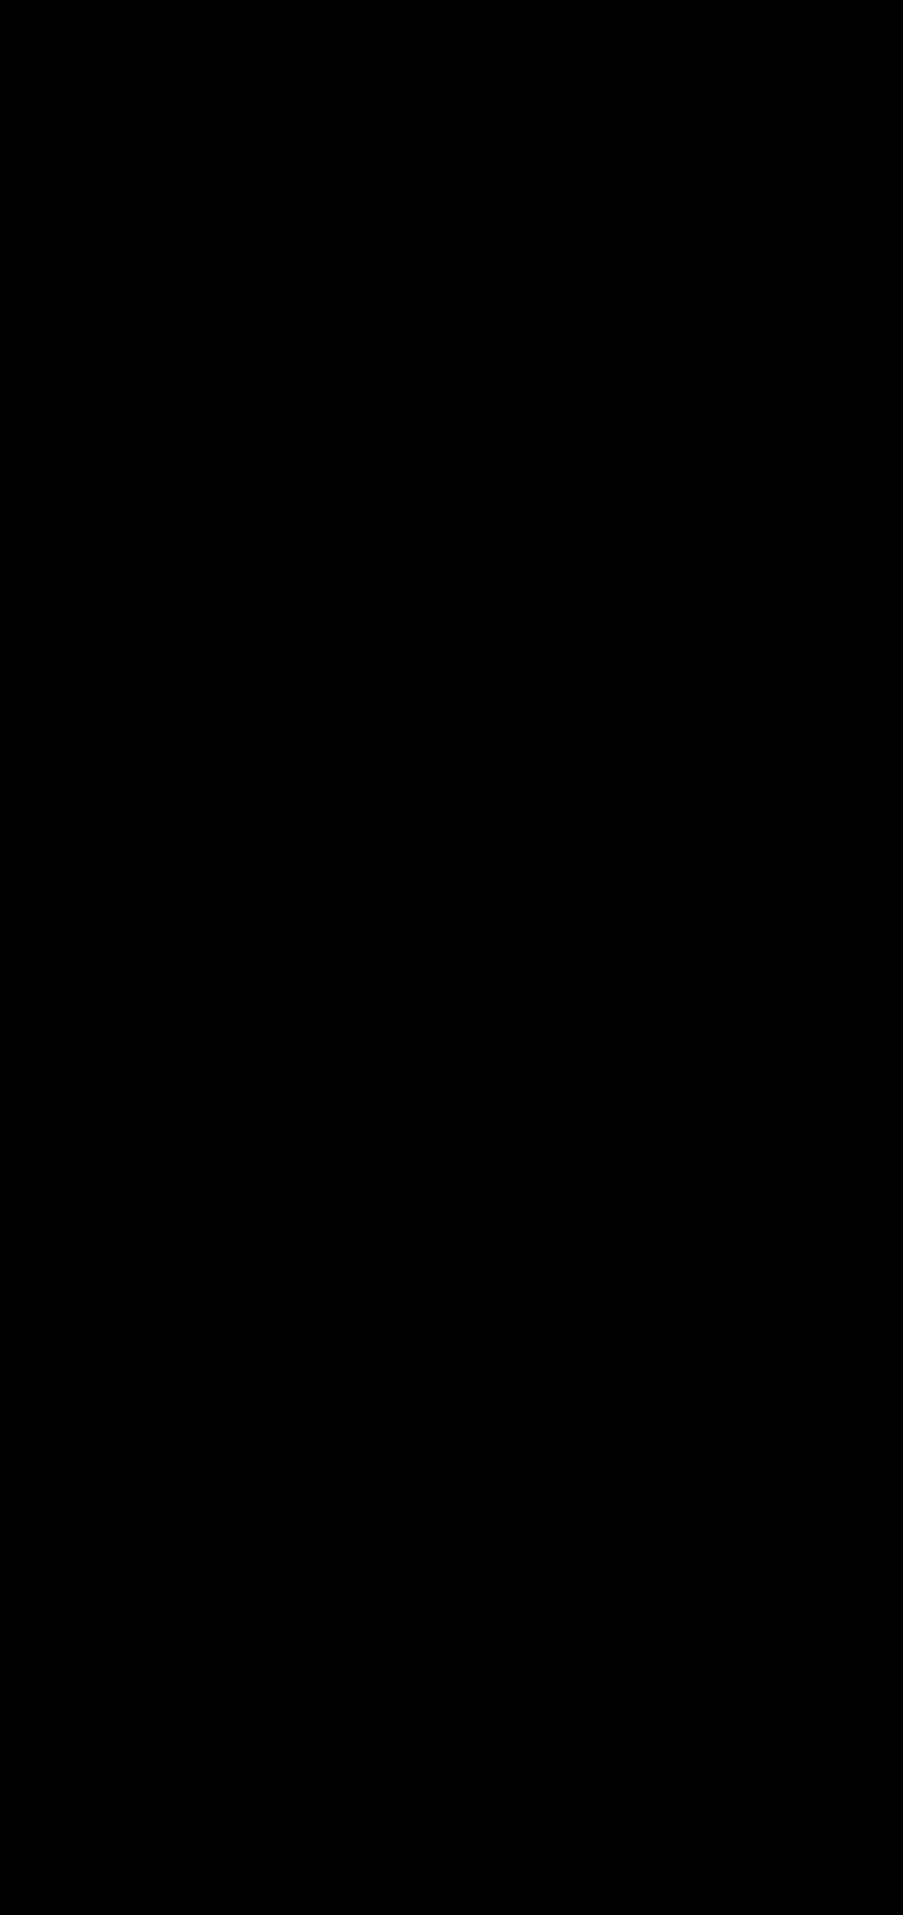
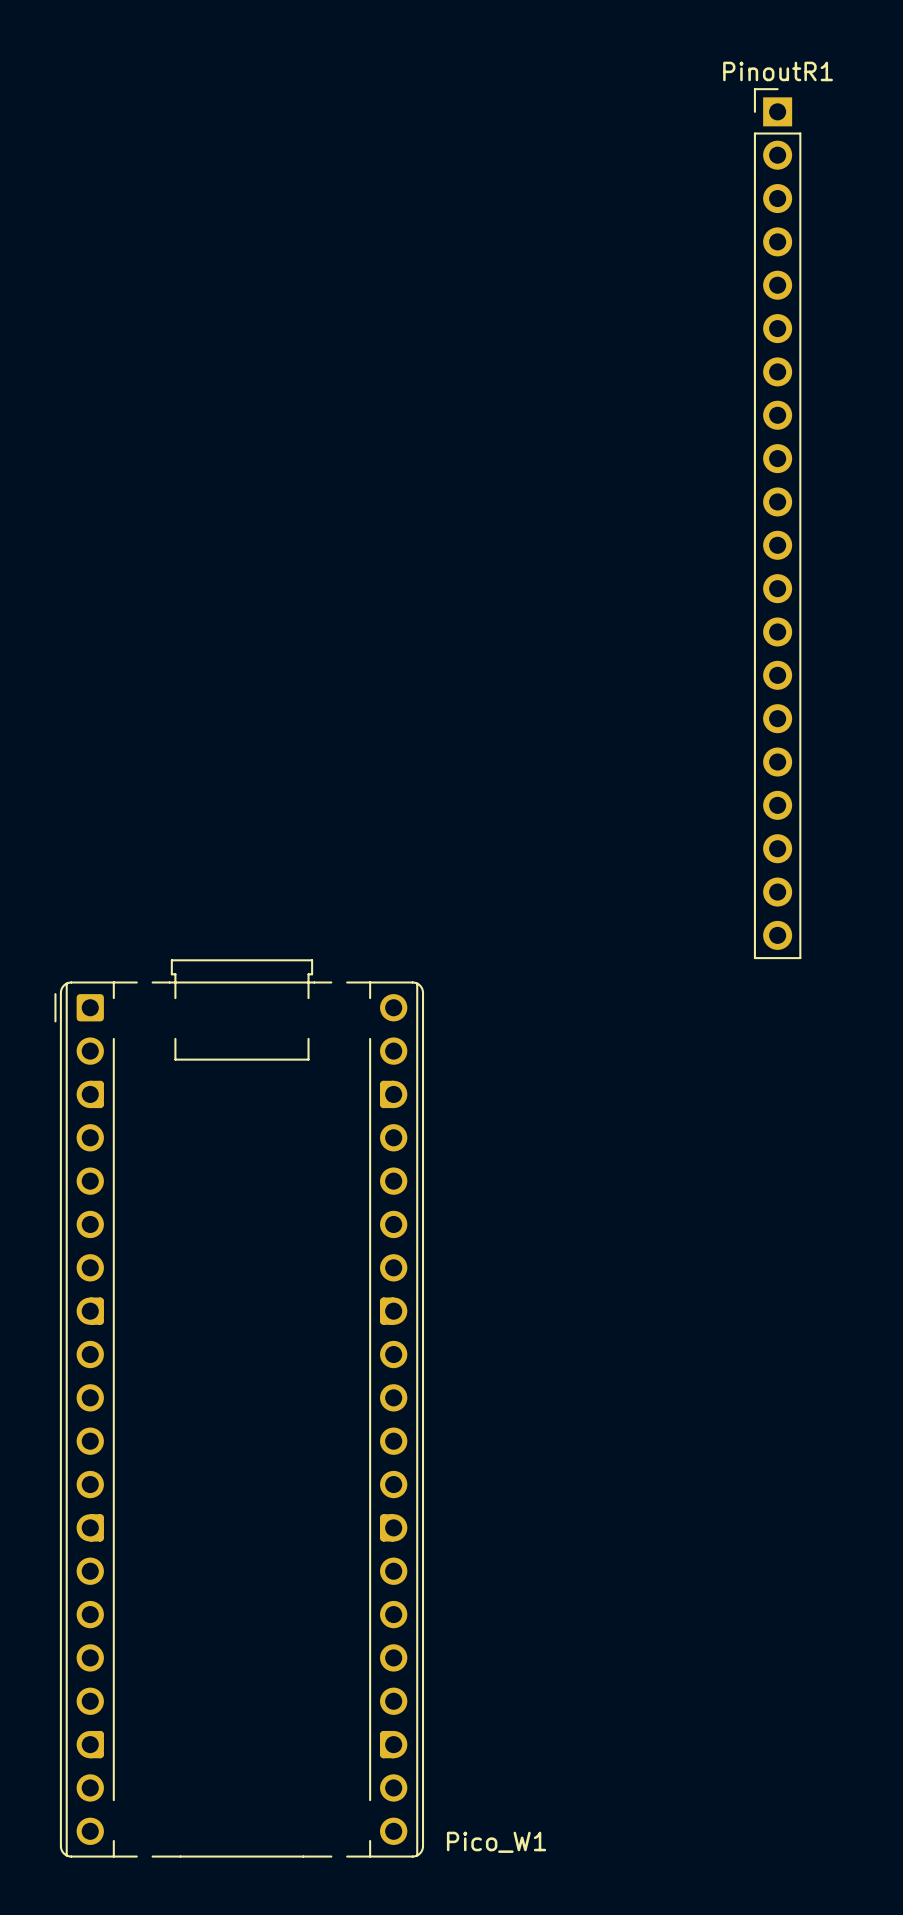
PinoutR1: none -> (777, 523)
Pico_W1: none -> (239, 1408)

